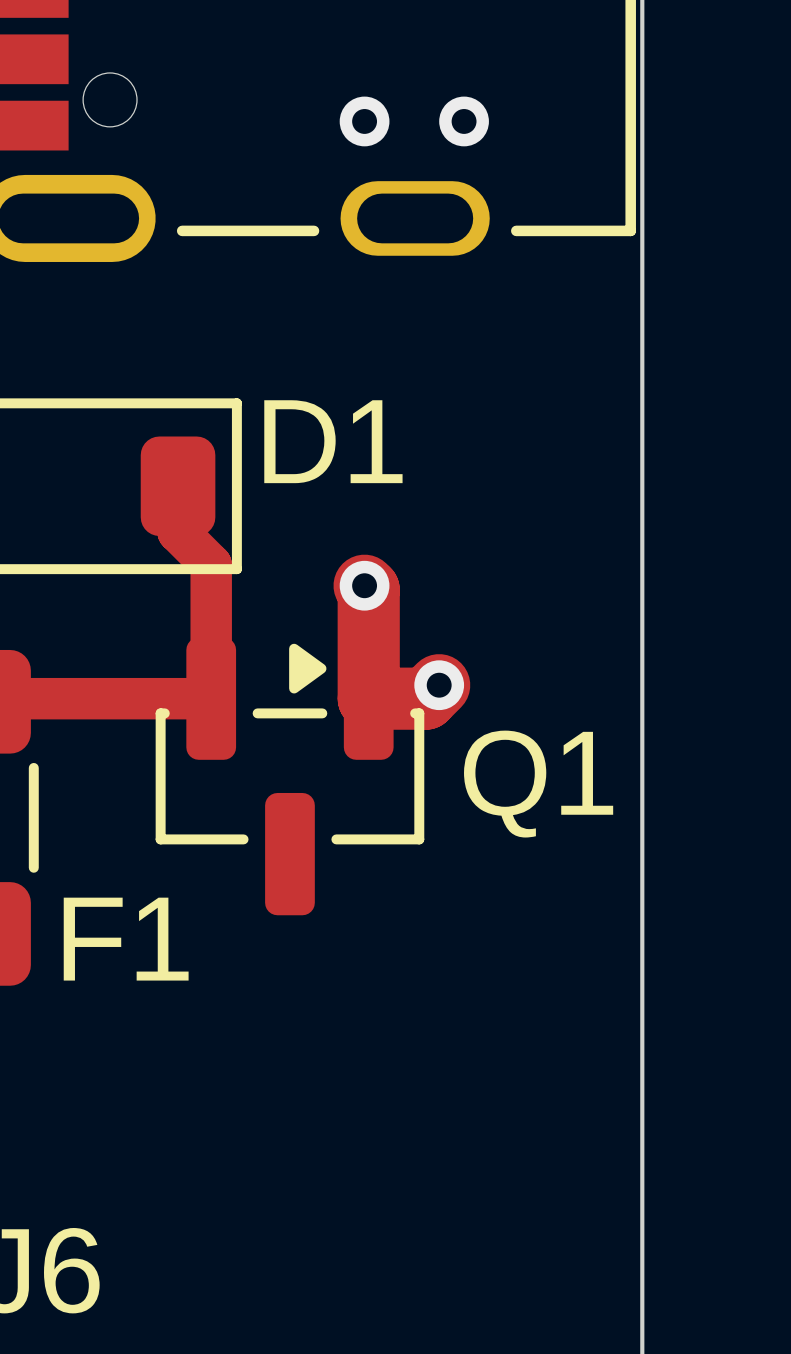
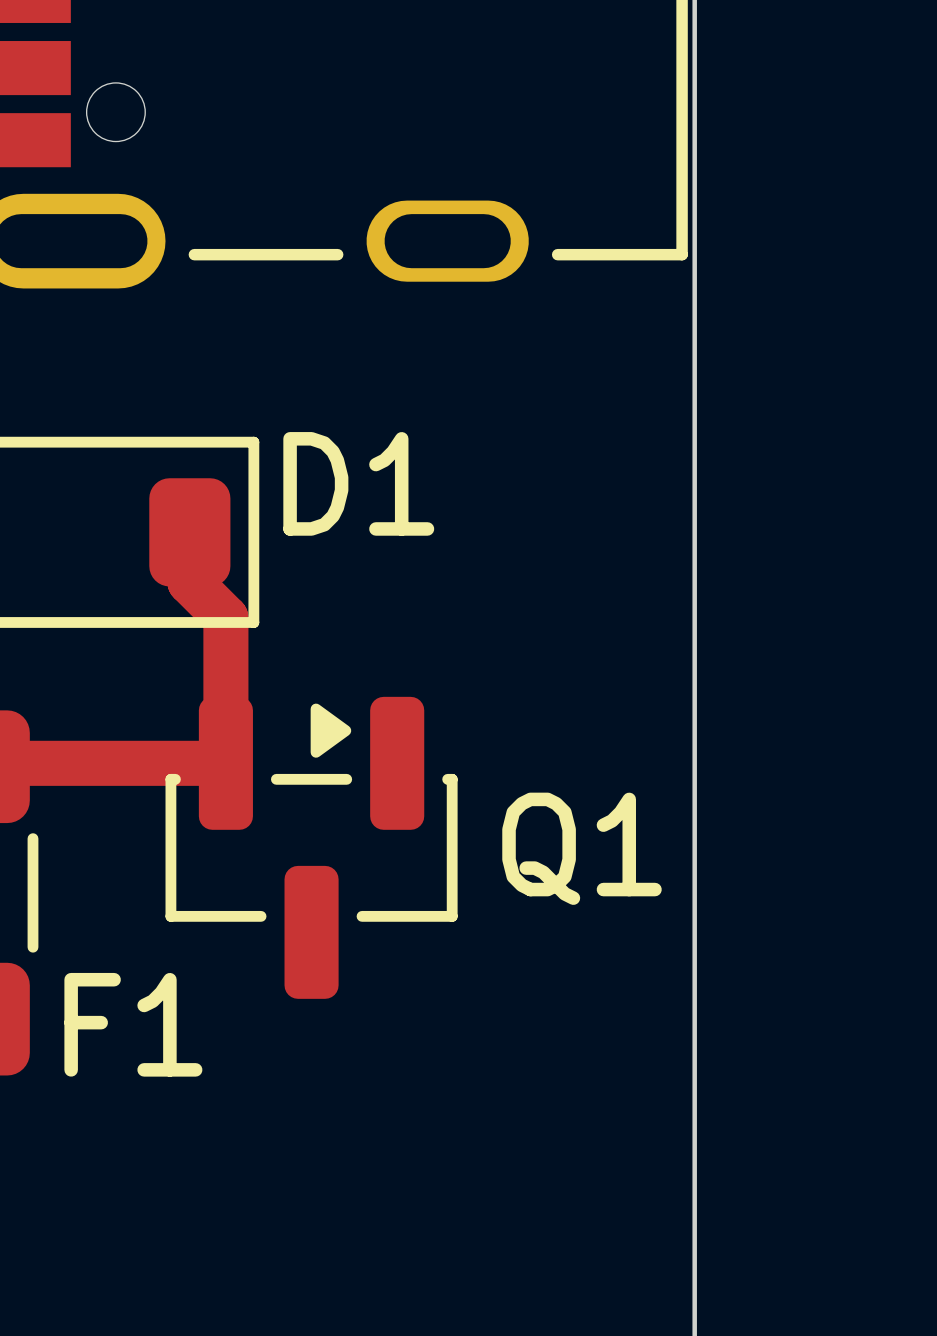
via: (364, 121) -> none
via: (464, 121) -> none
track: (364, 585) (368, 589) (368, 698) (425, 698) (439, 685) -> none
via: (364, 585) -> none
via: (439, 685) -> none

